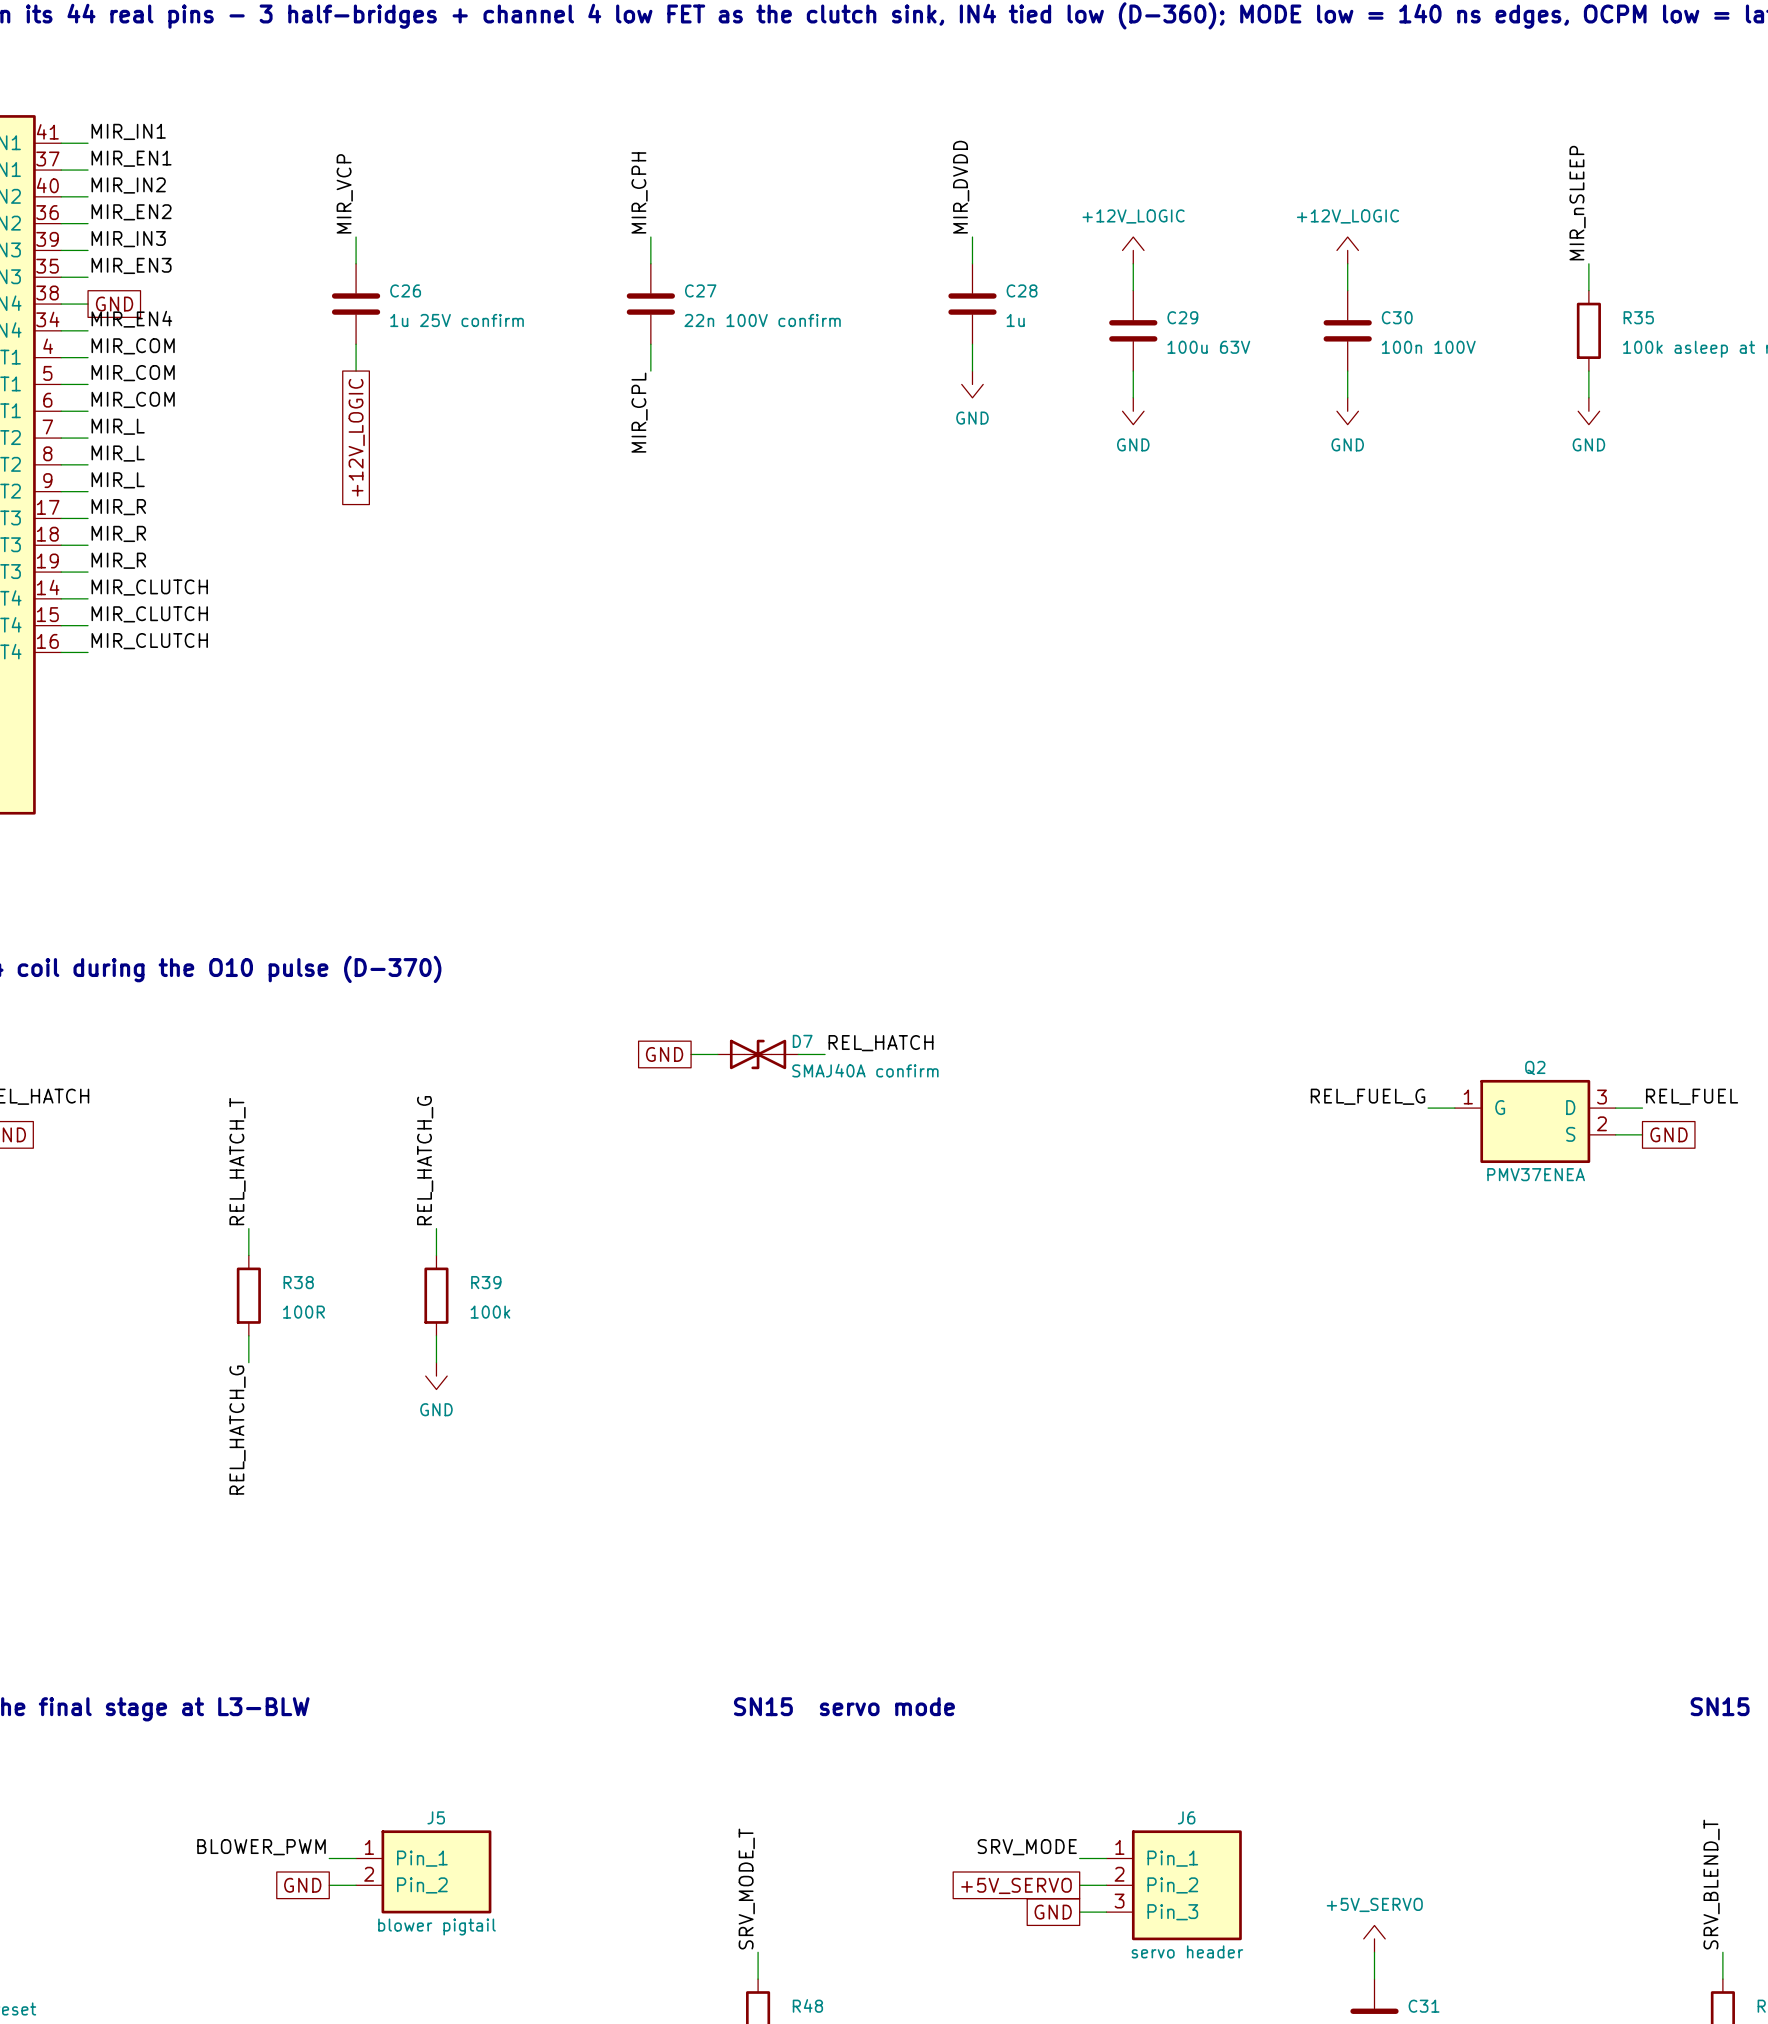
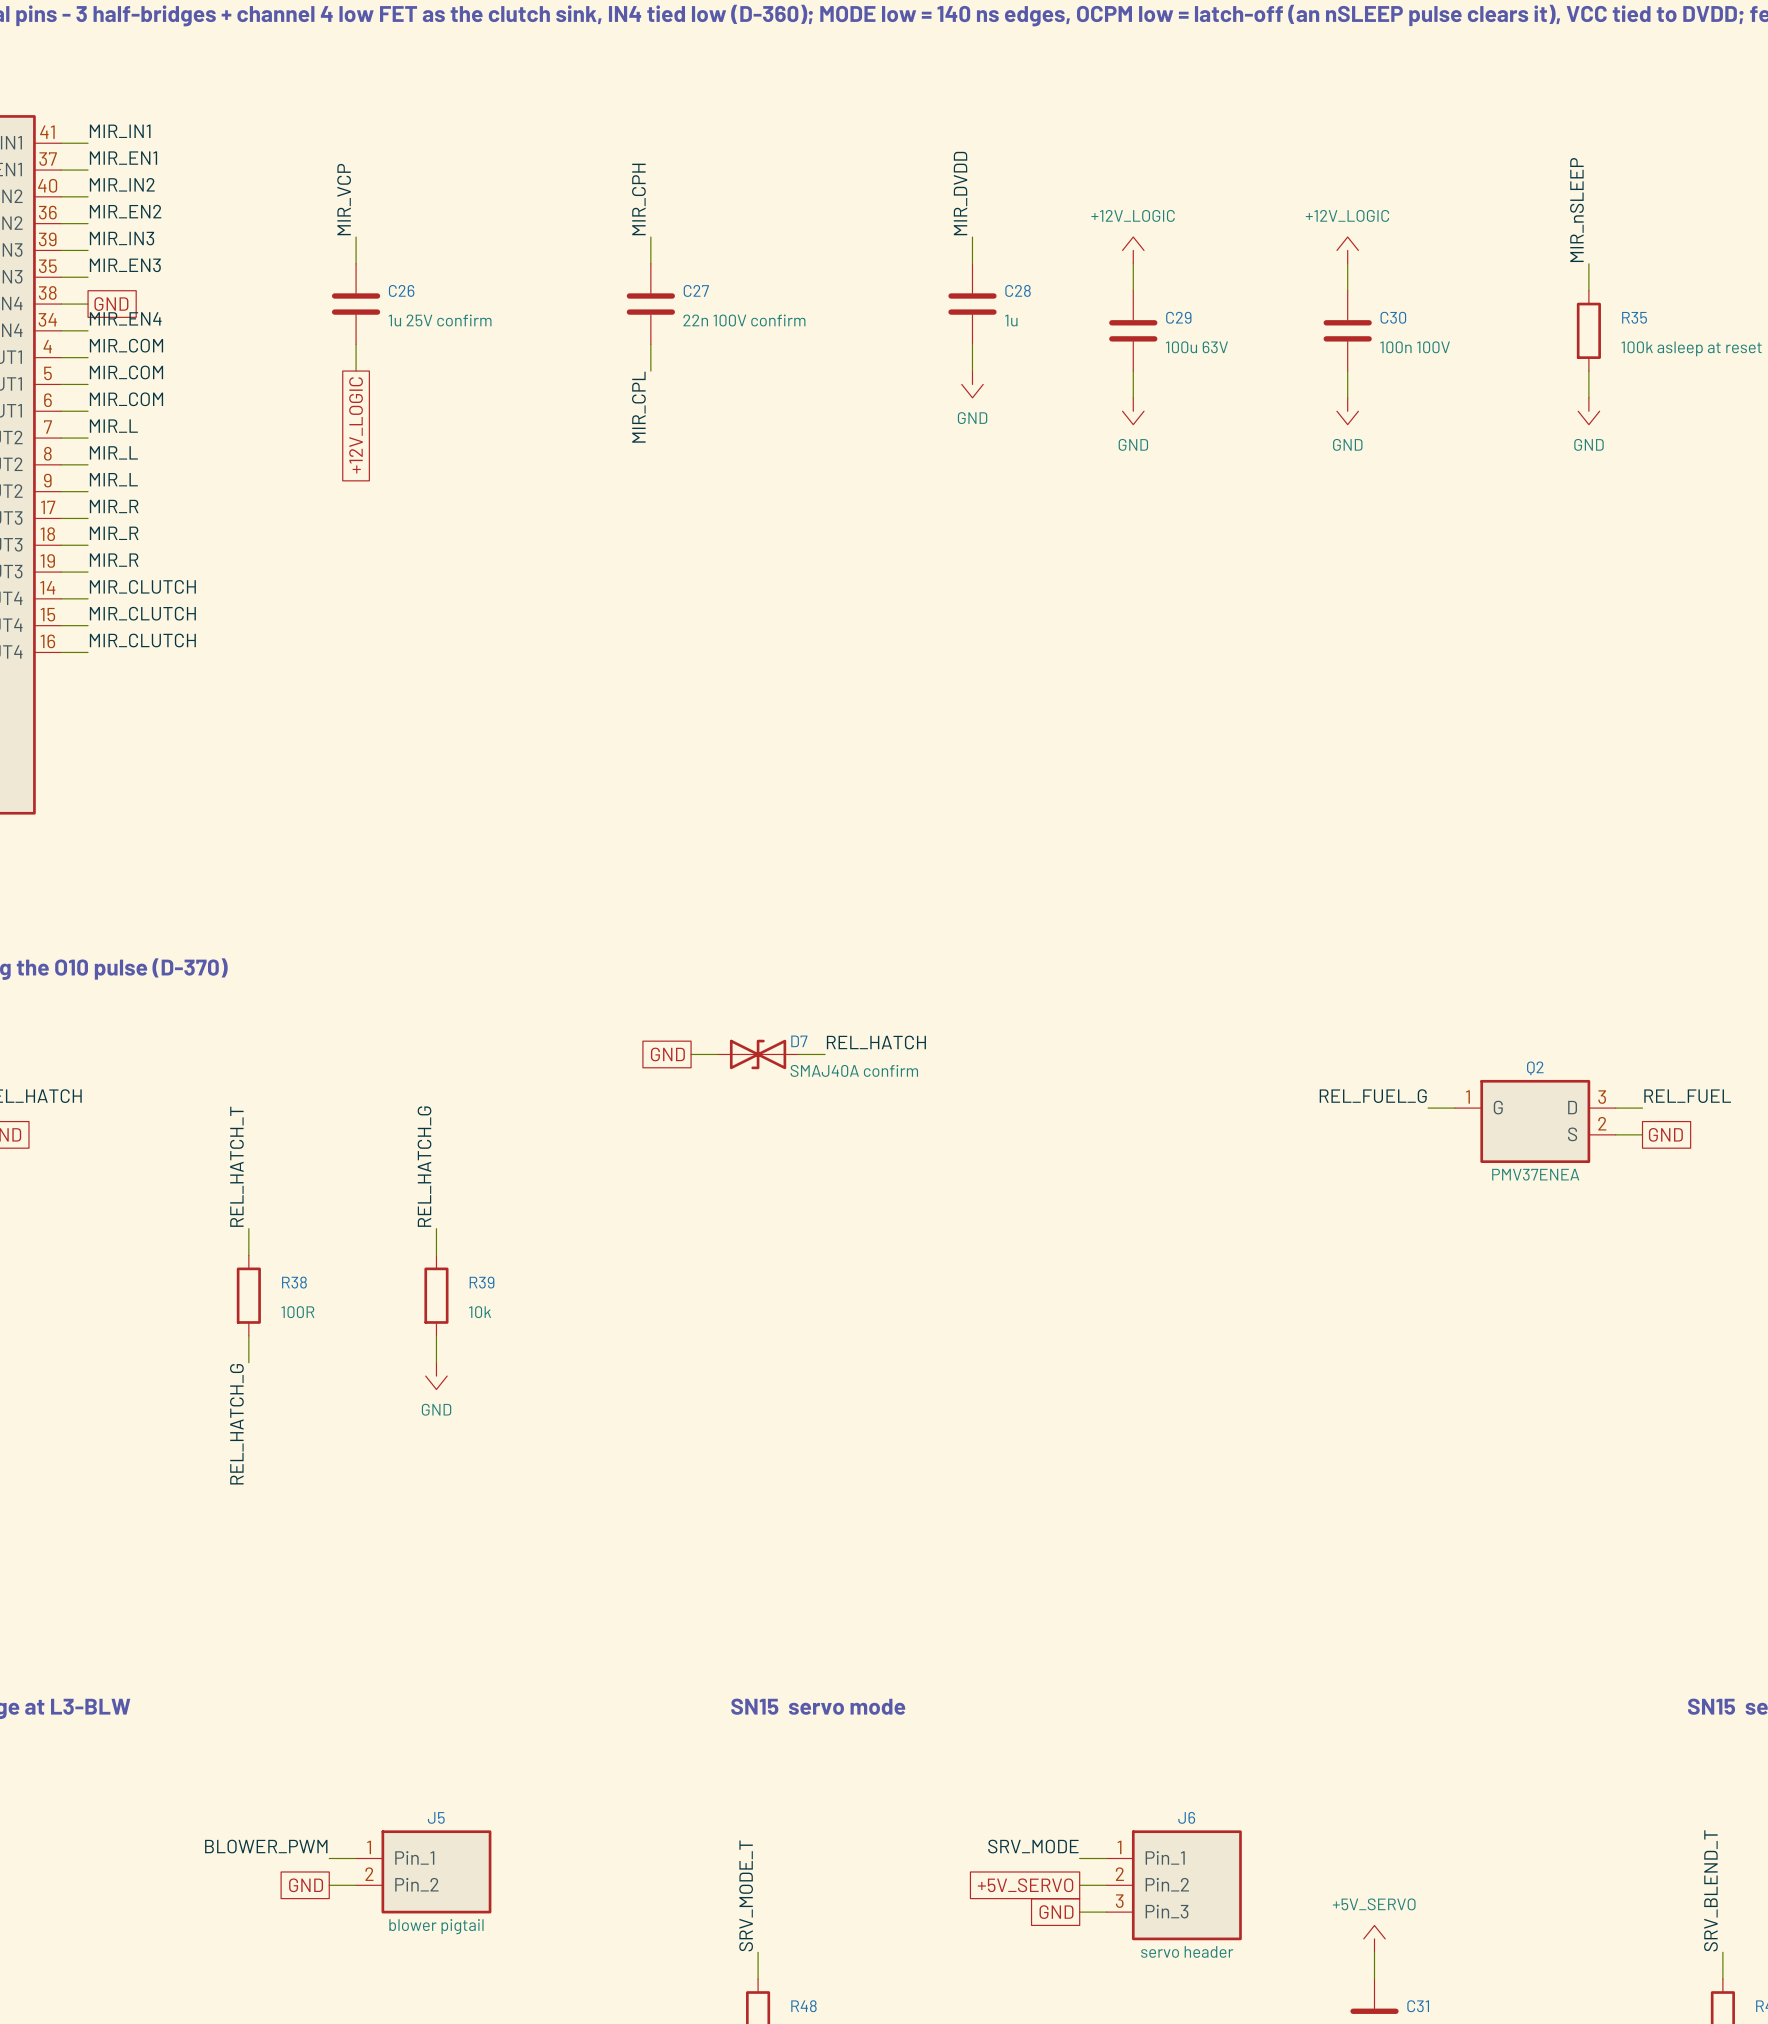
R39 value: 100k (490, 1312) -> 10k (480, 1312)

